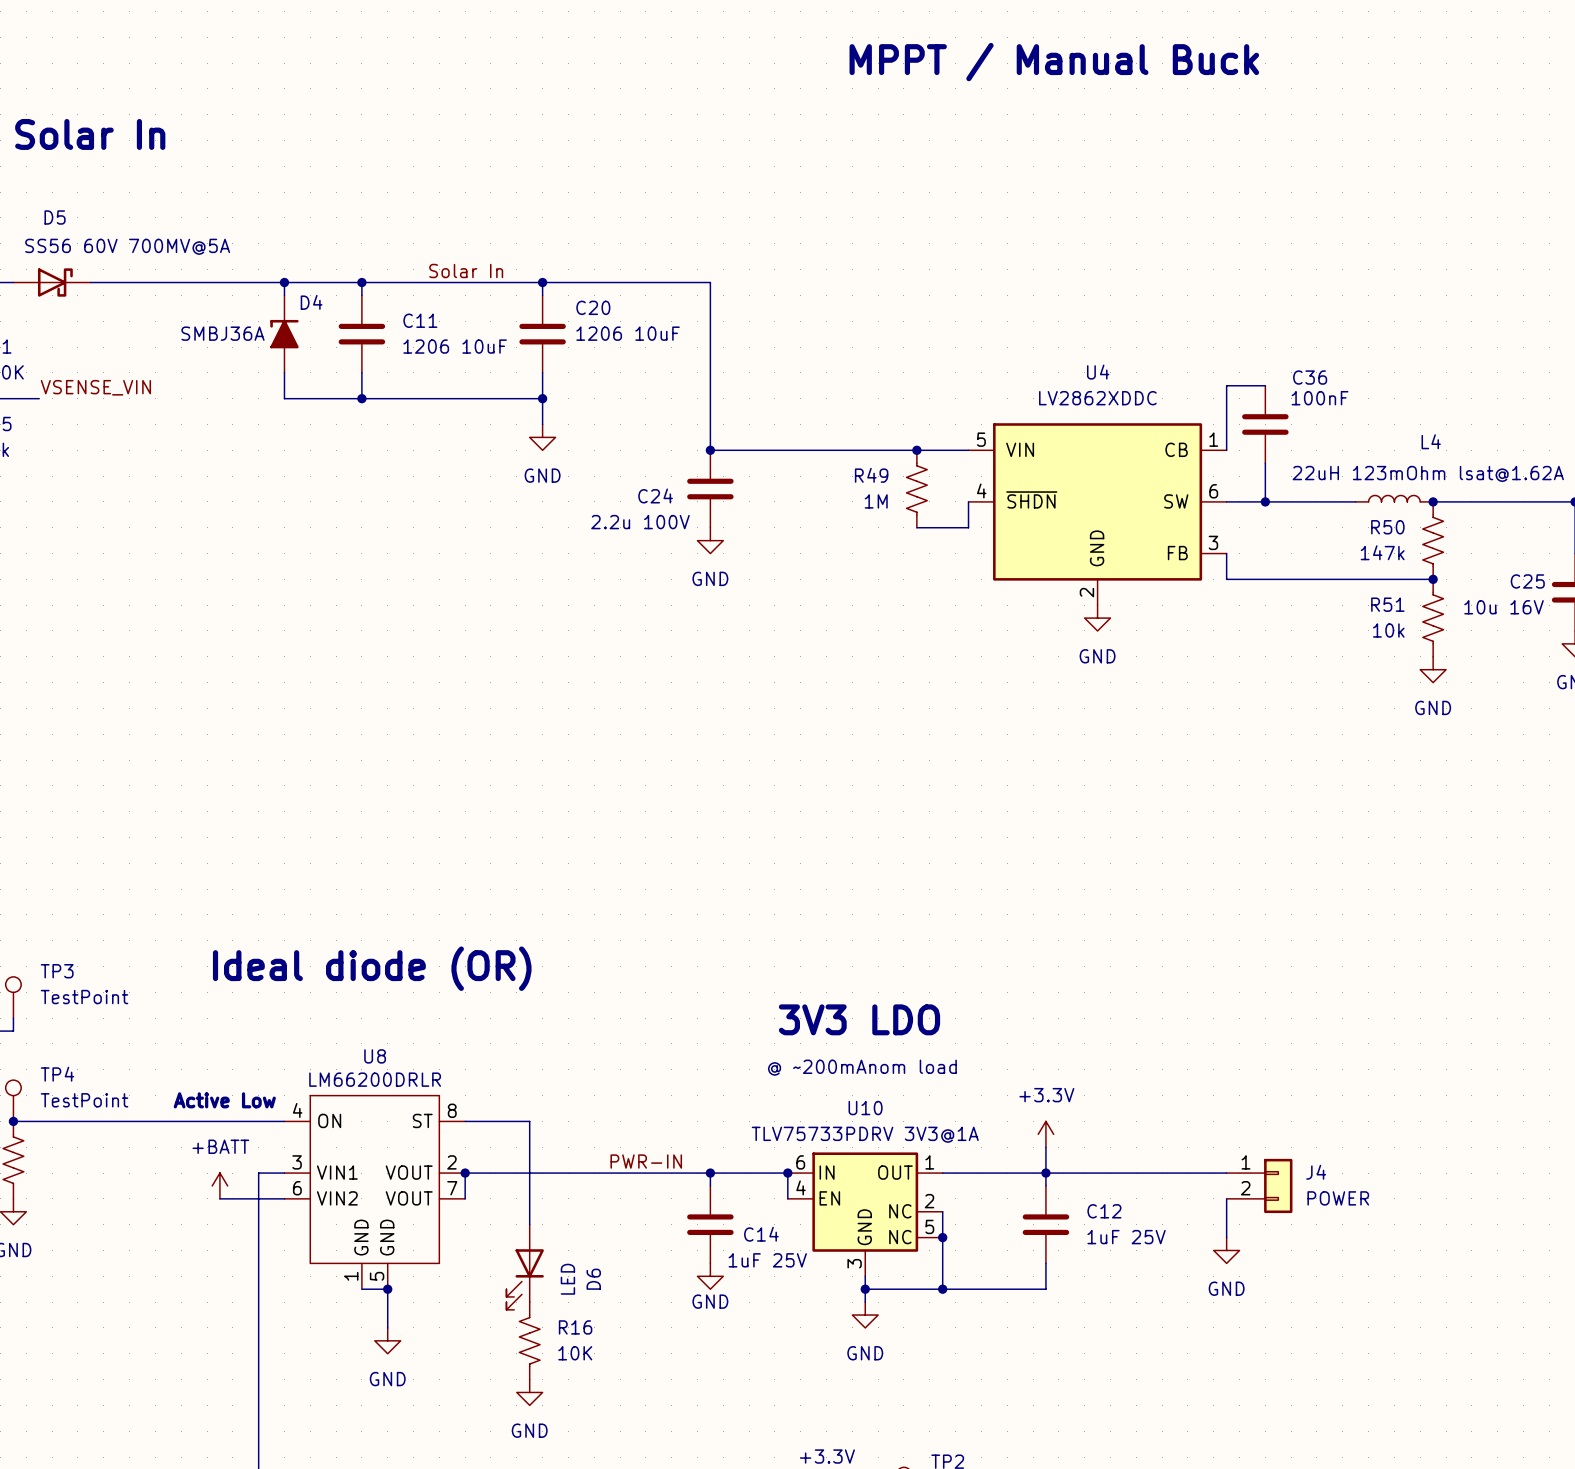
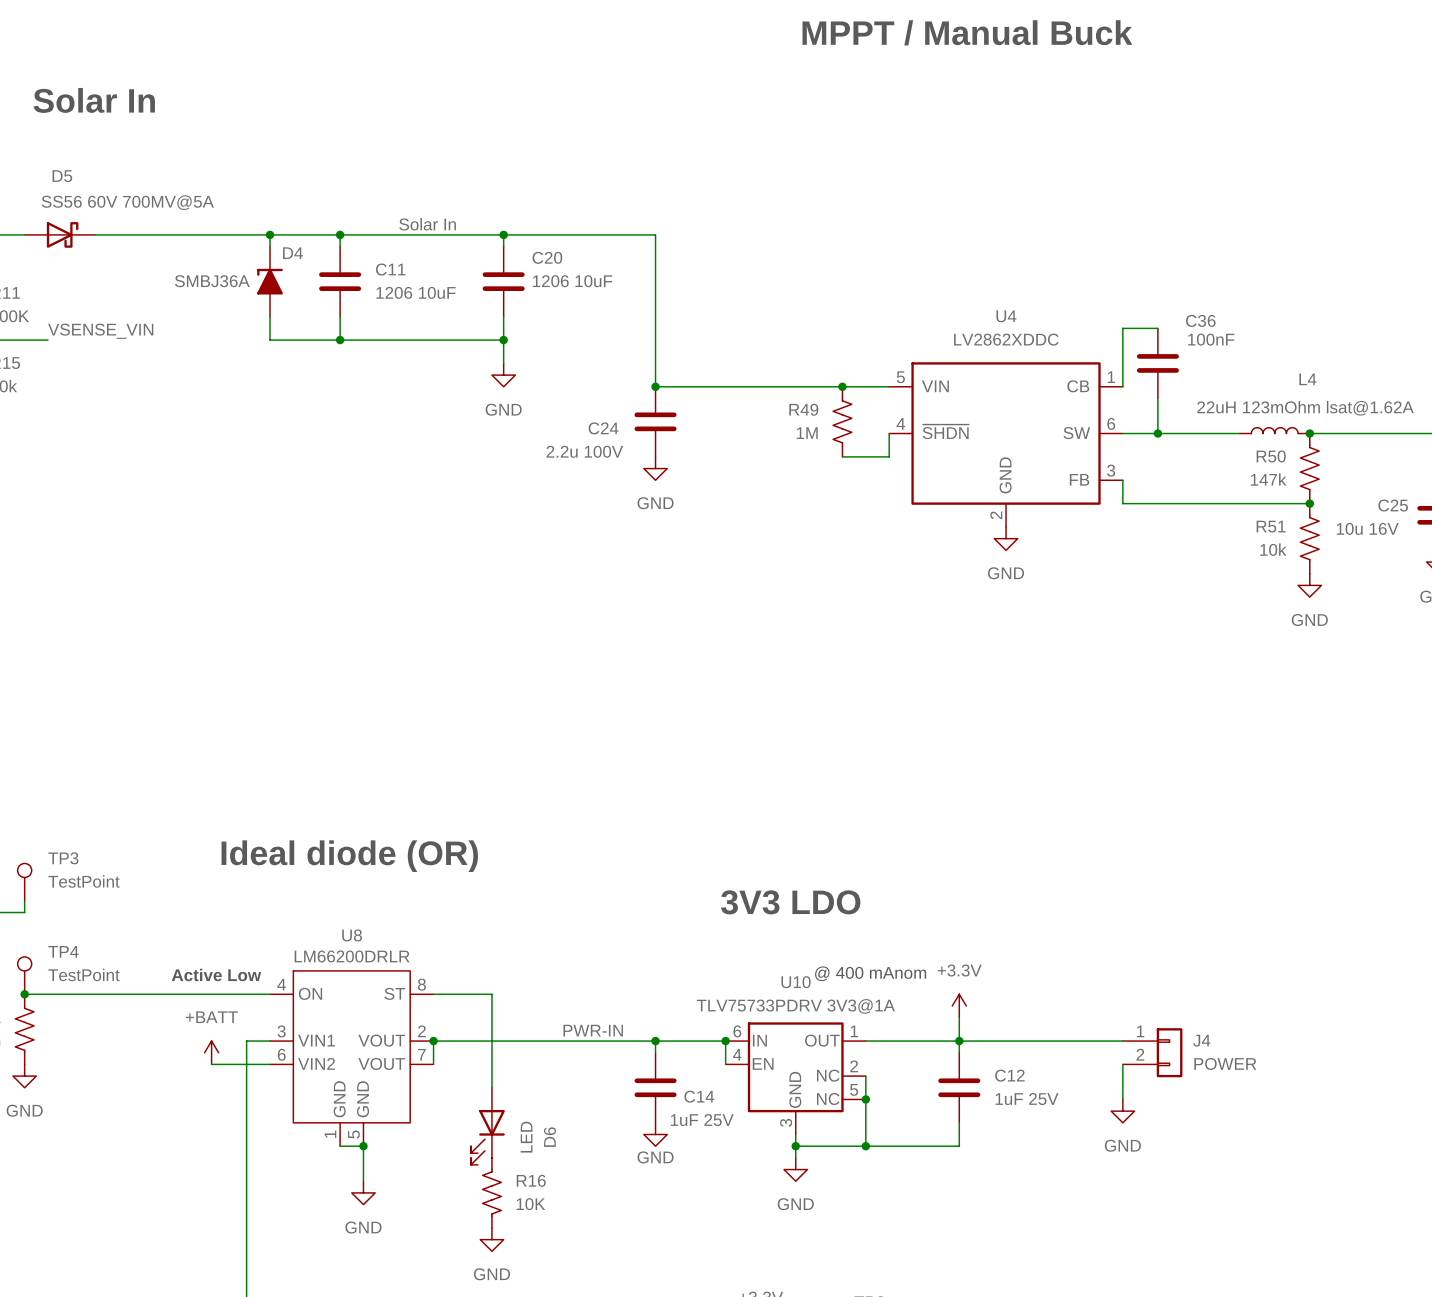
text: @ ~200mAnom load (862, 1067) -> none
text: none -> @ 400 mAnom (870, 973)

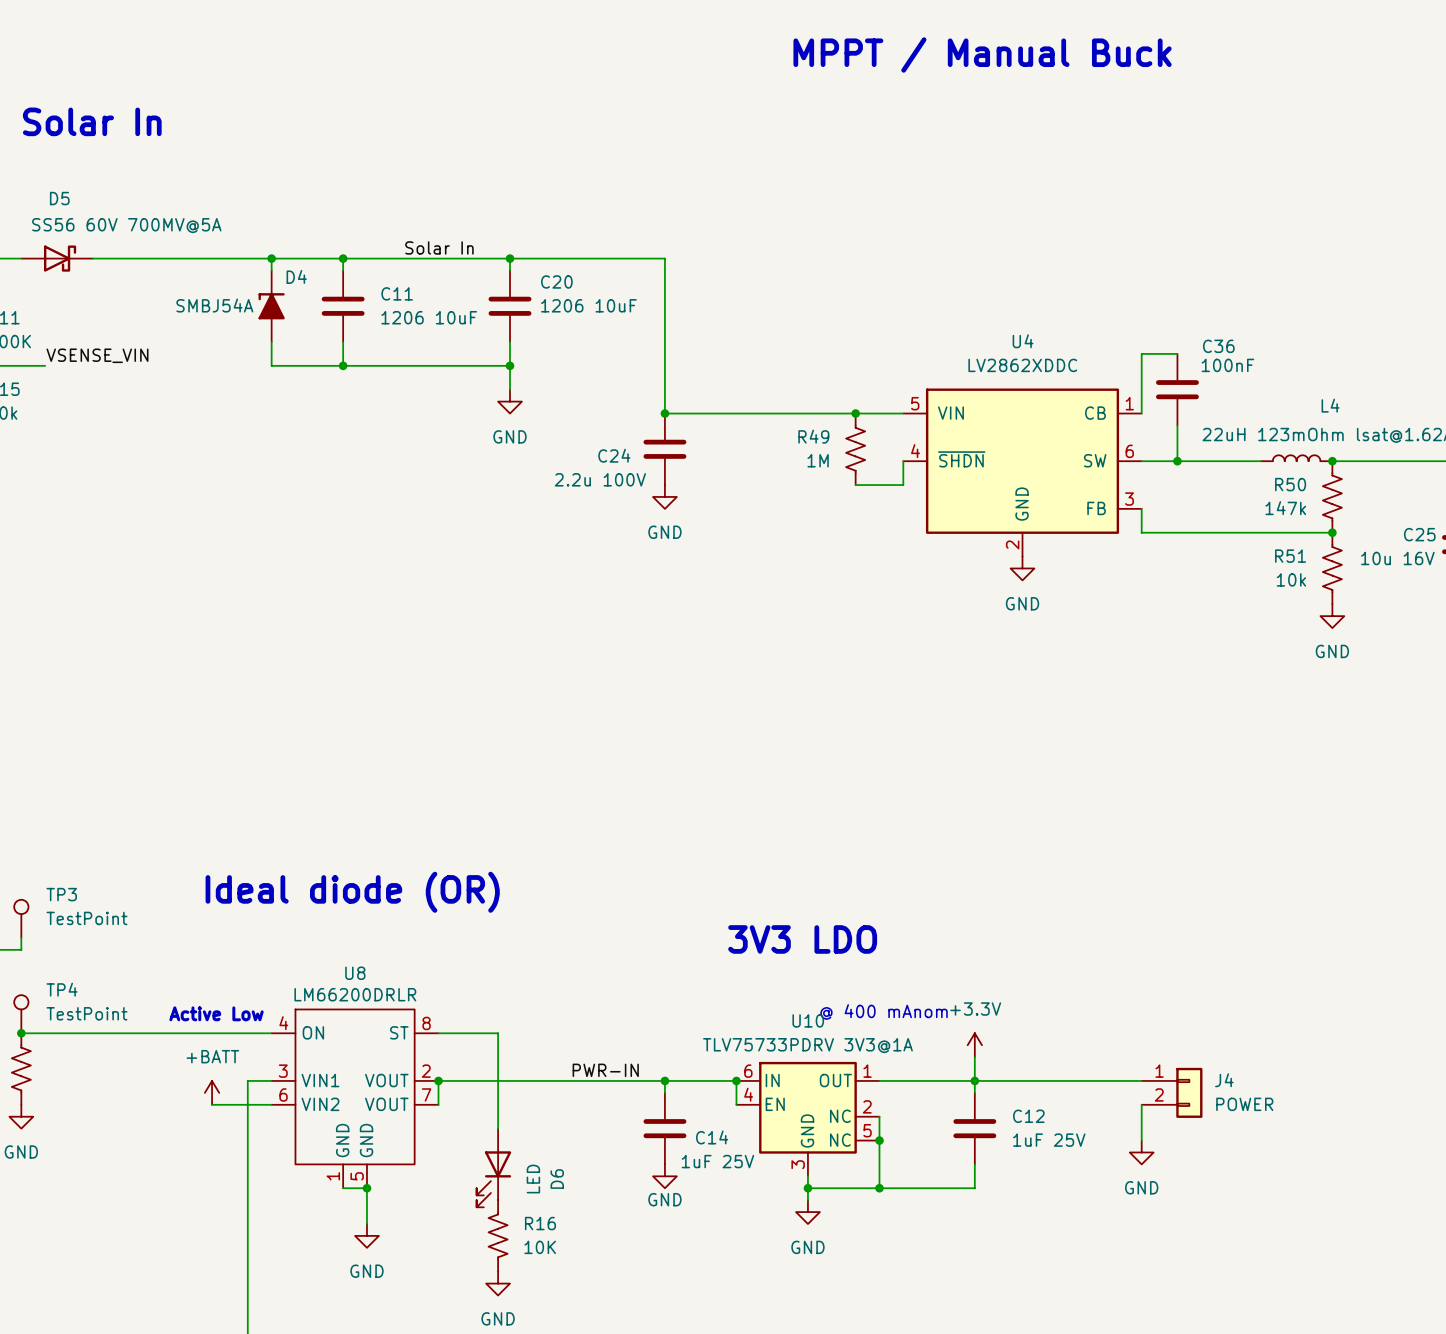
D4 value: SMBJ36A (212, 281) -> SMBJ54A (214, 305)

